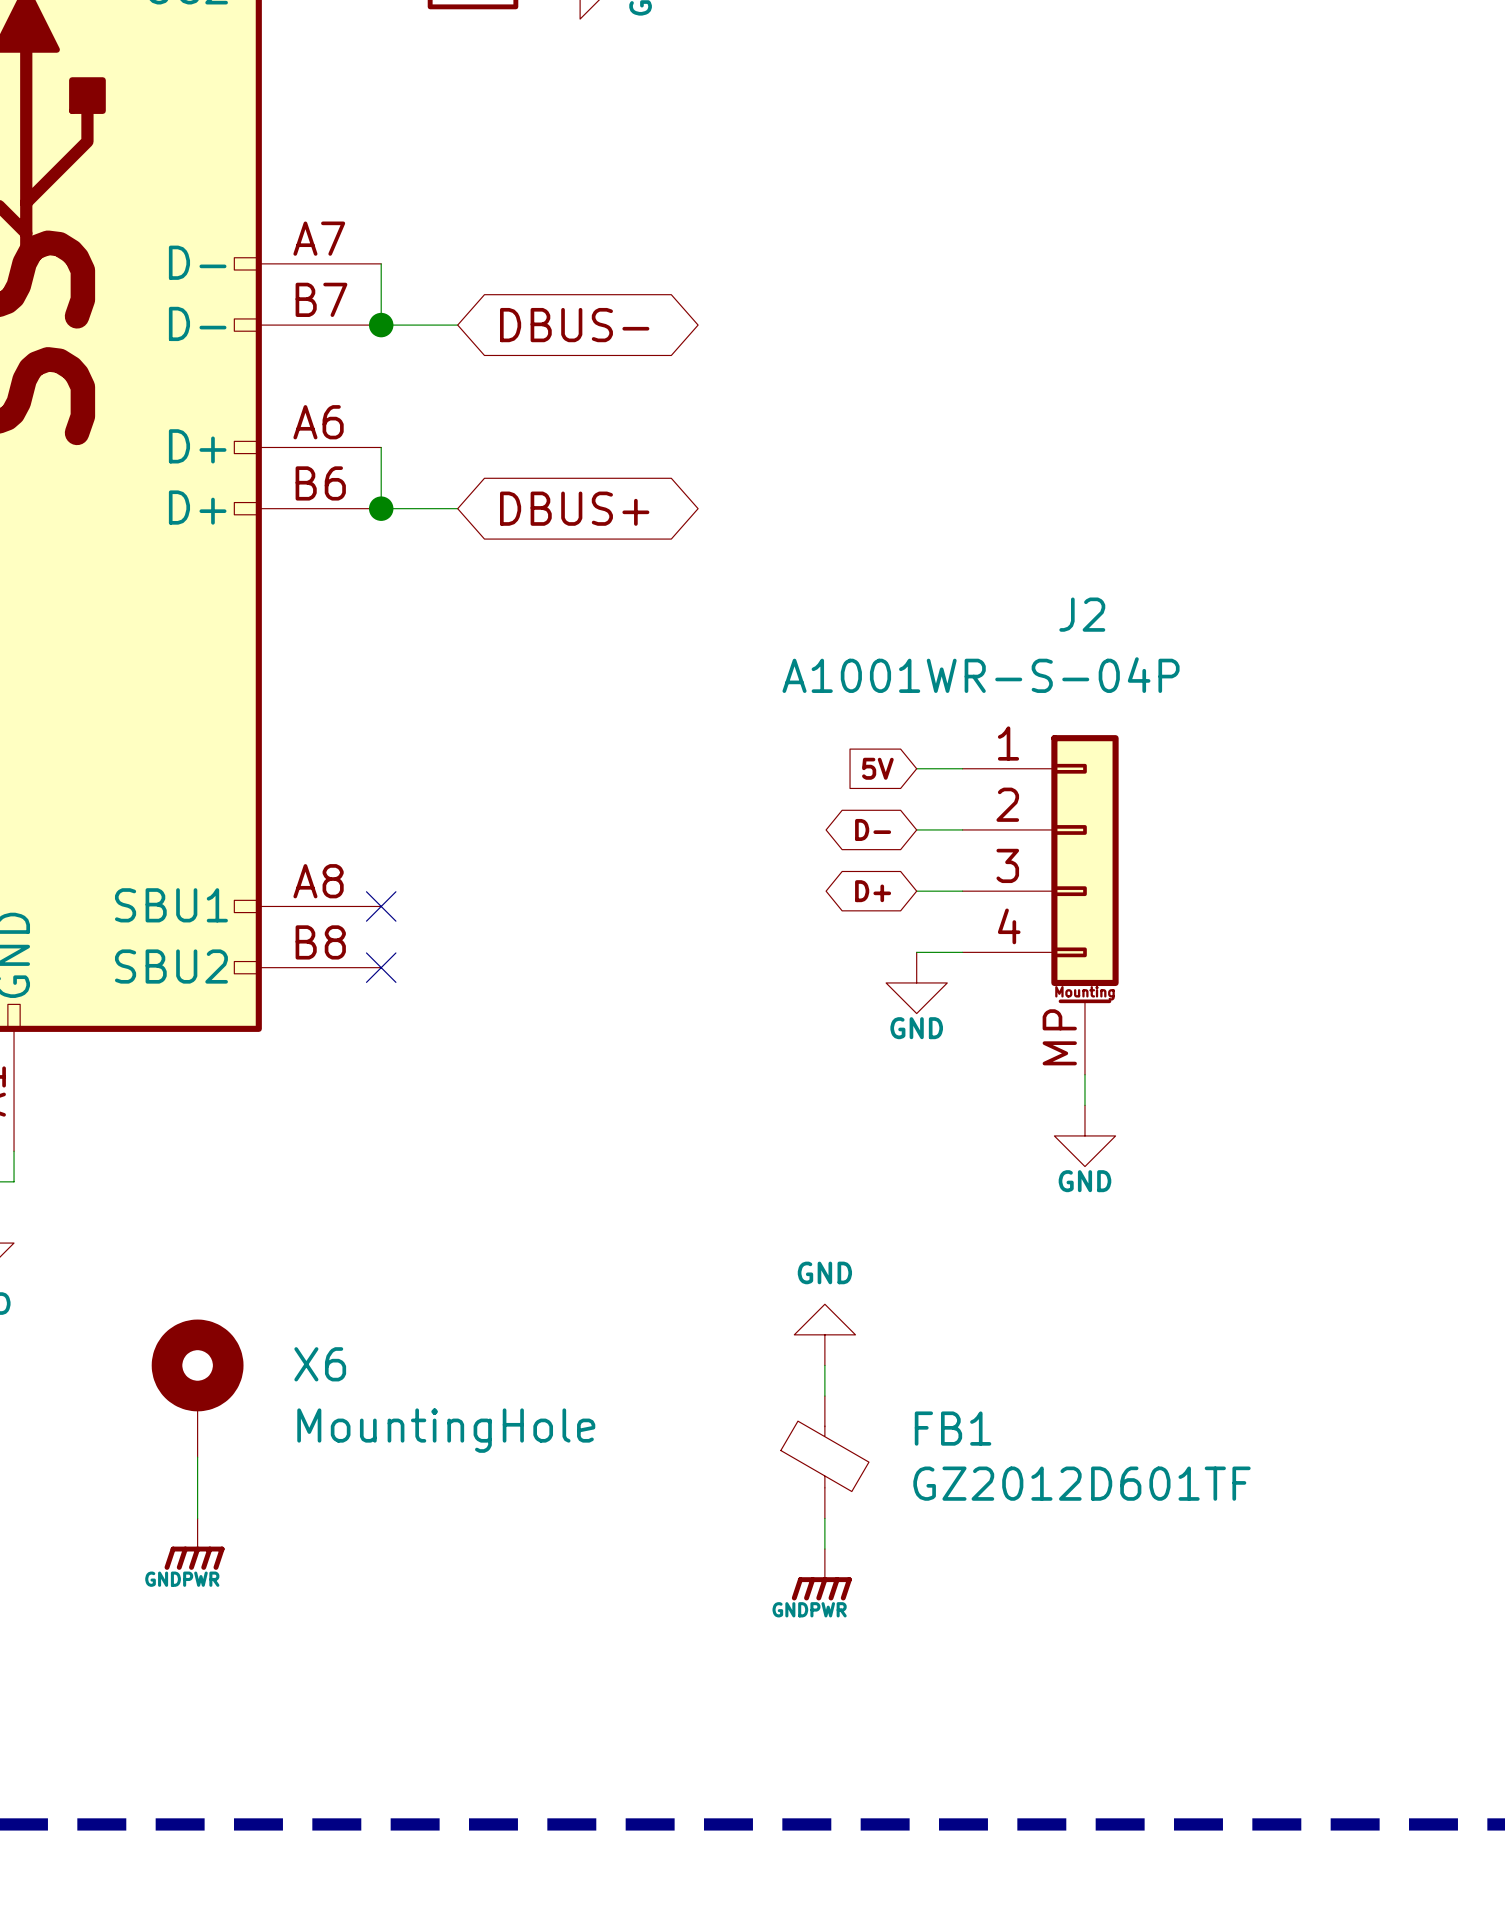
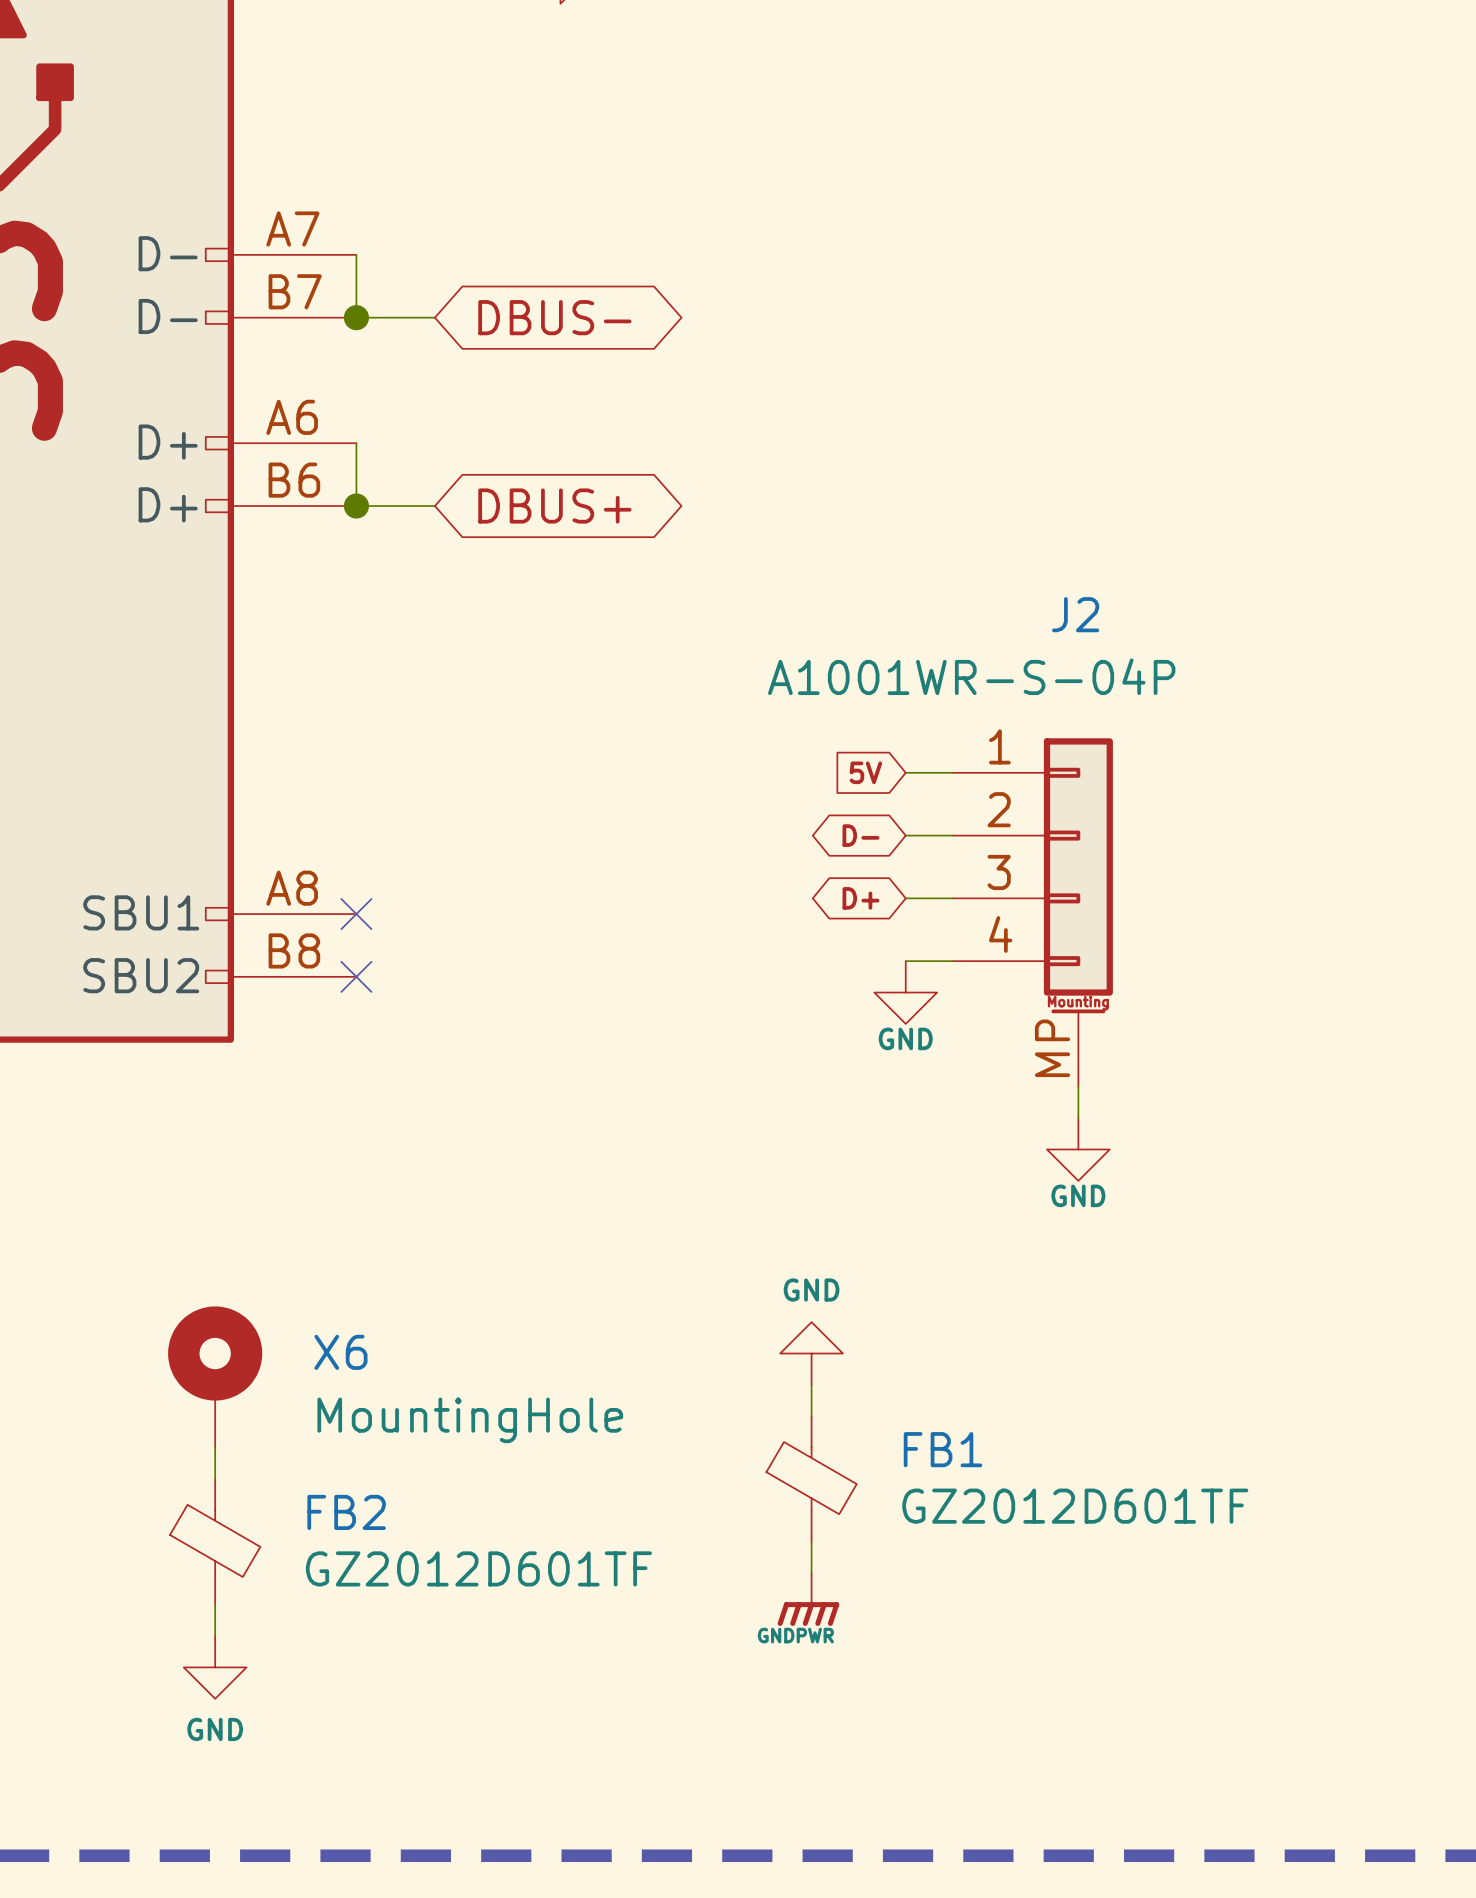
X6 position: (197, 1388) -> (215, 1377)
wire: none -> (215, 1447) (215, 1479)
wire: (197, 1457) (197, 1518) -> none
FB2: none -> GZ2012D601TF (215, 1541)
power symbol: GNDPWR (194, 1544) -> none
wire: none -> (215, 1604) (215, 1636)
power symbol: none -> GND (215, 1667)

